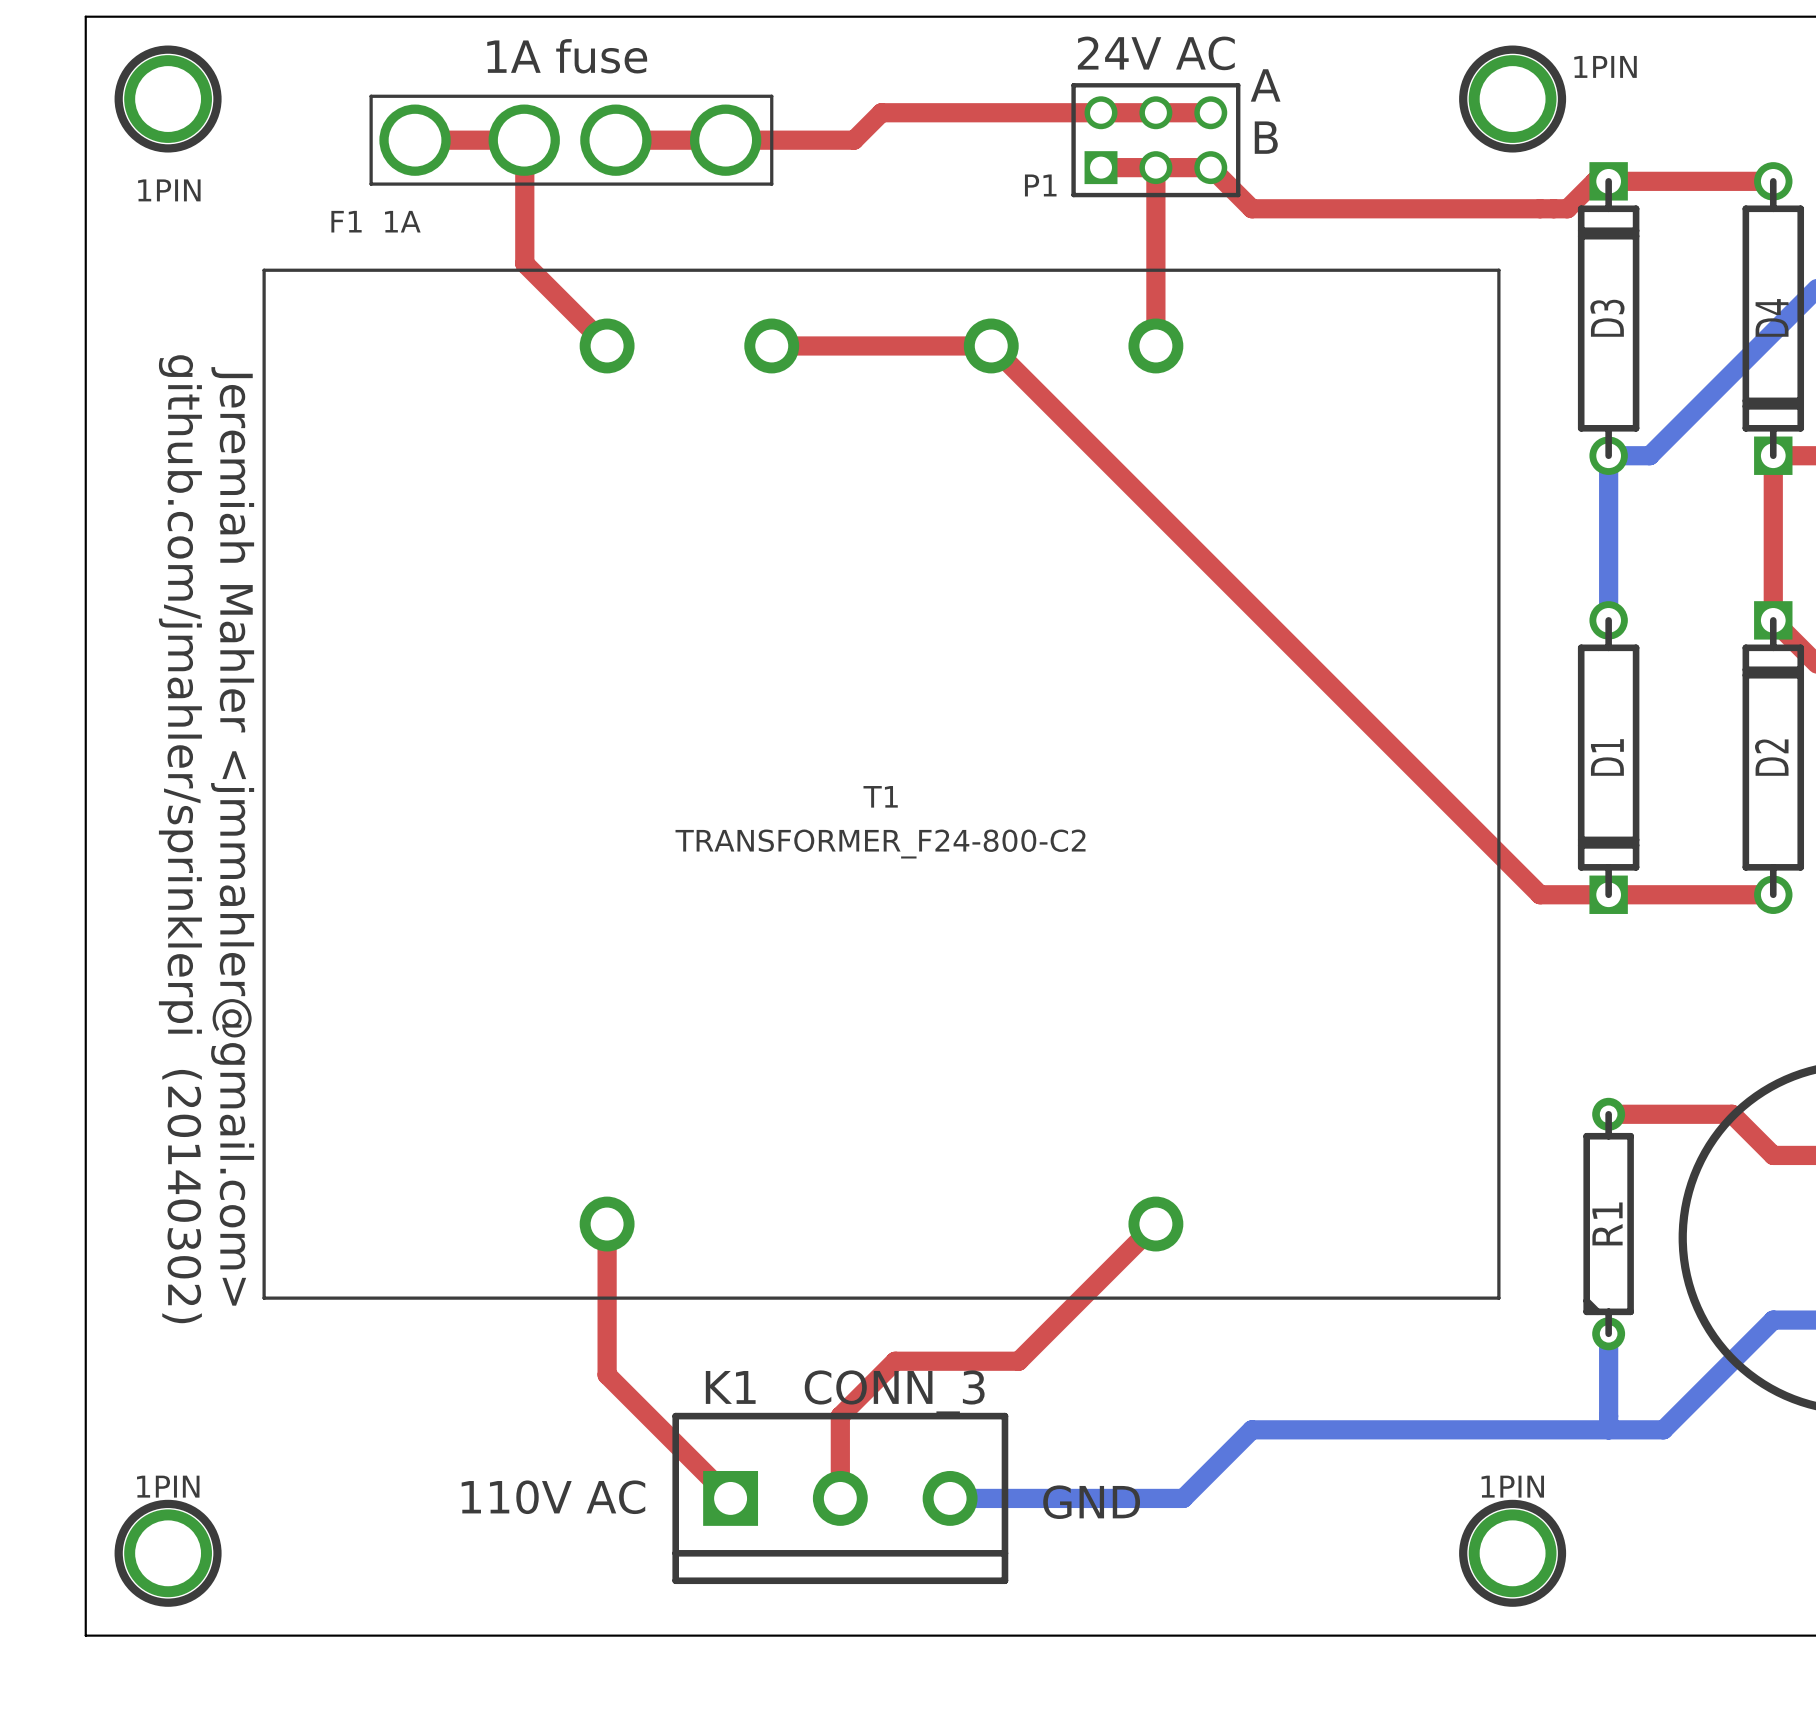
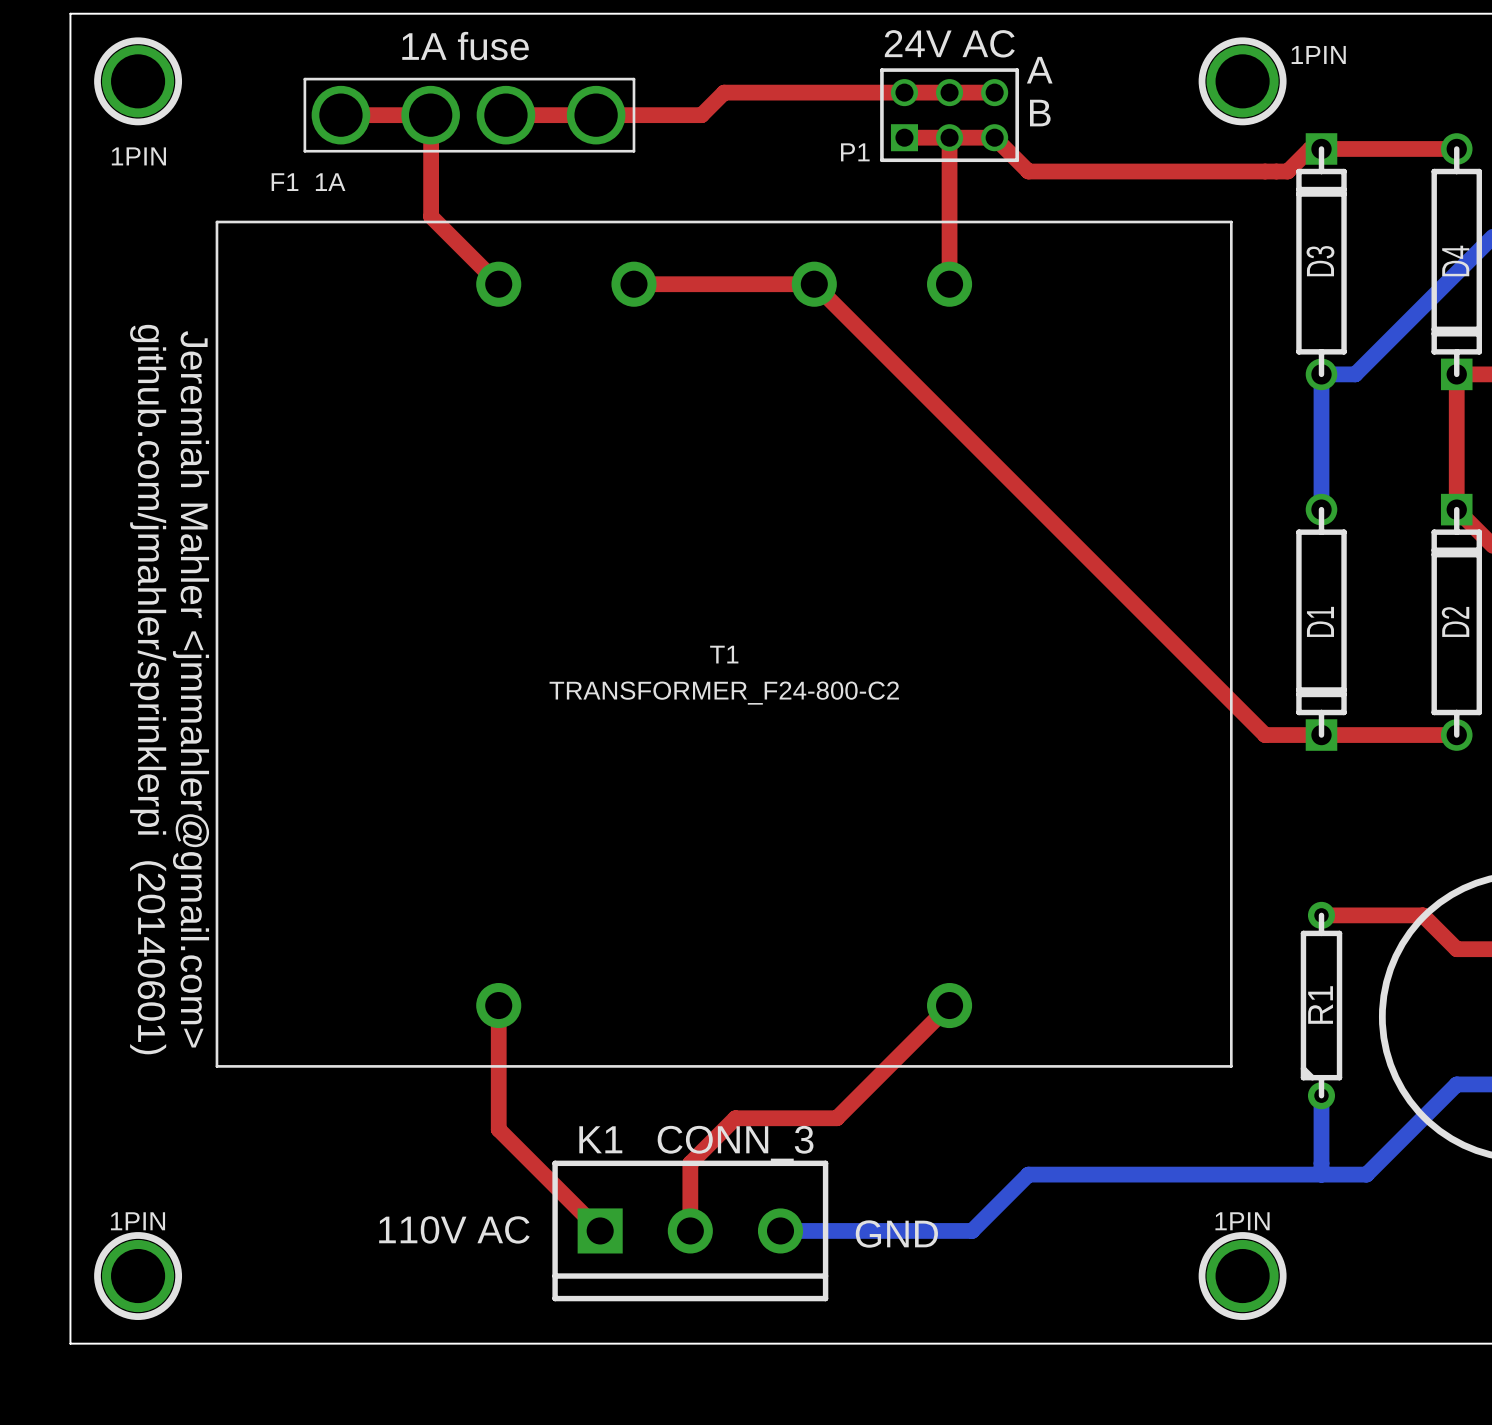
text: github.com/jmahler/sprinklerpi (20140302) (180, 839) -> github.com/jmahler/sprinklerpi (20140601) (148, 689)

